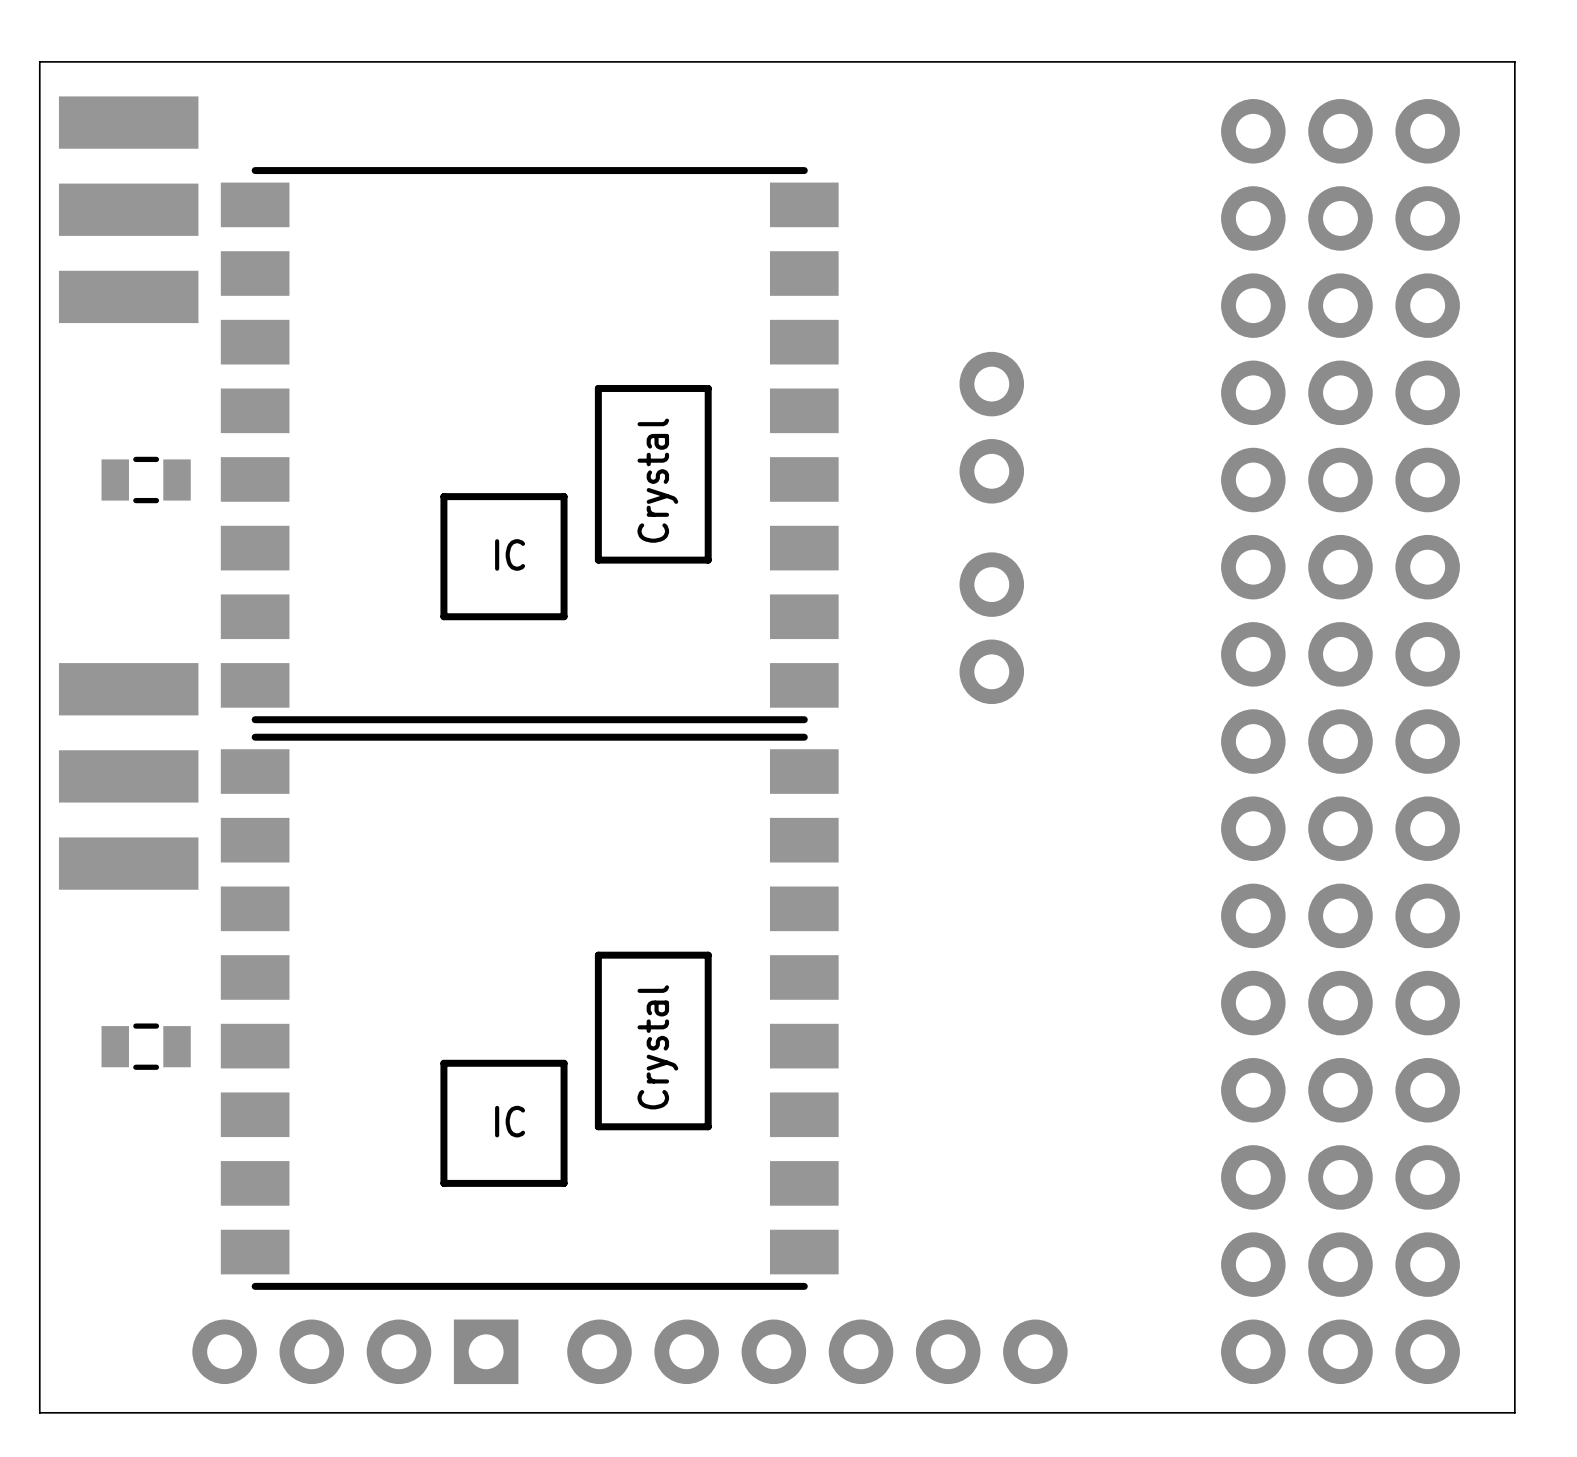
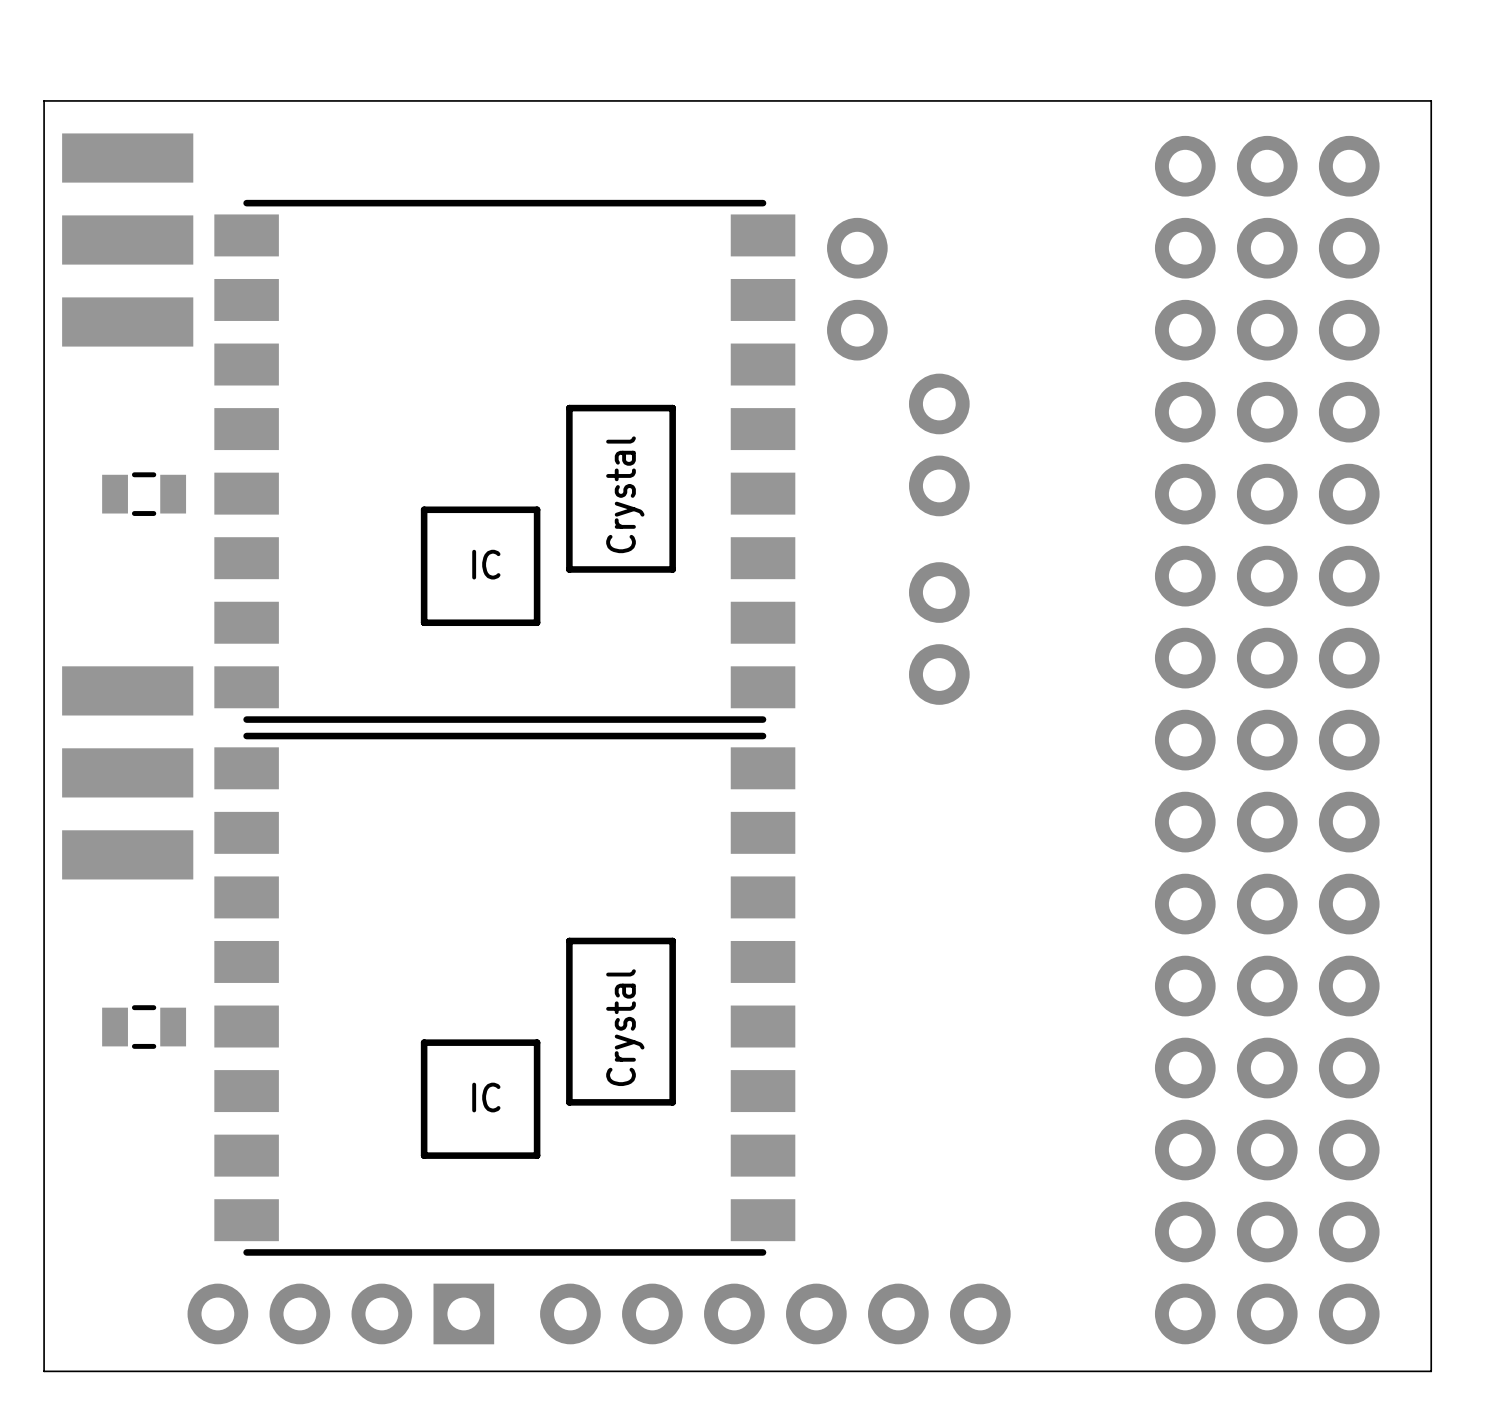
part: none -> (857, 289)

